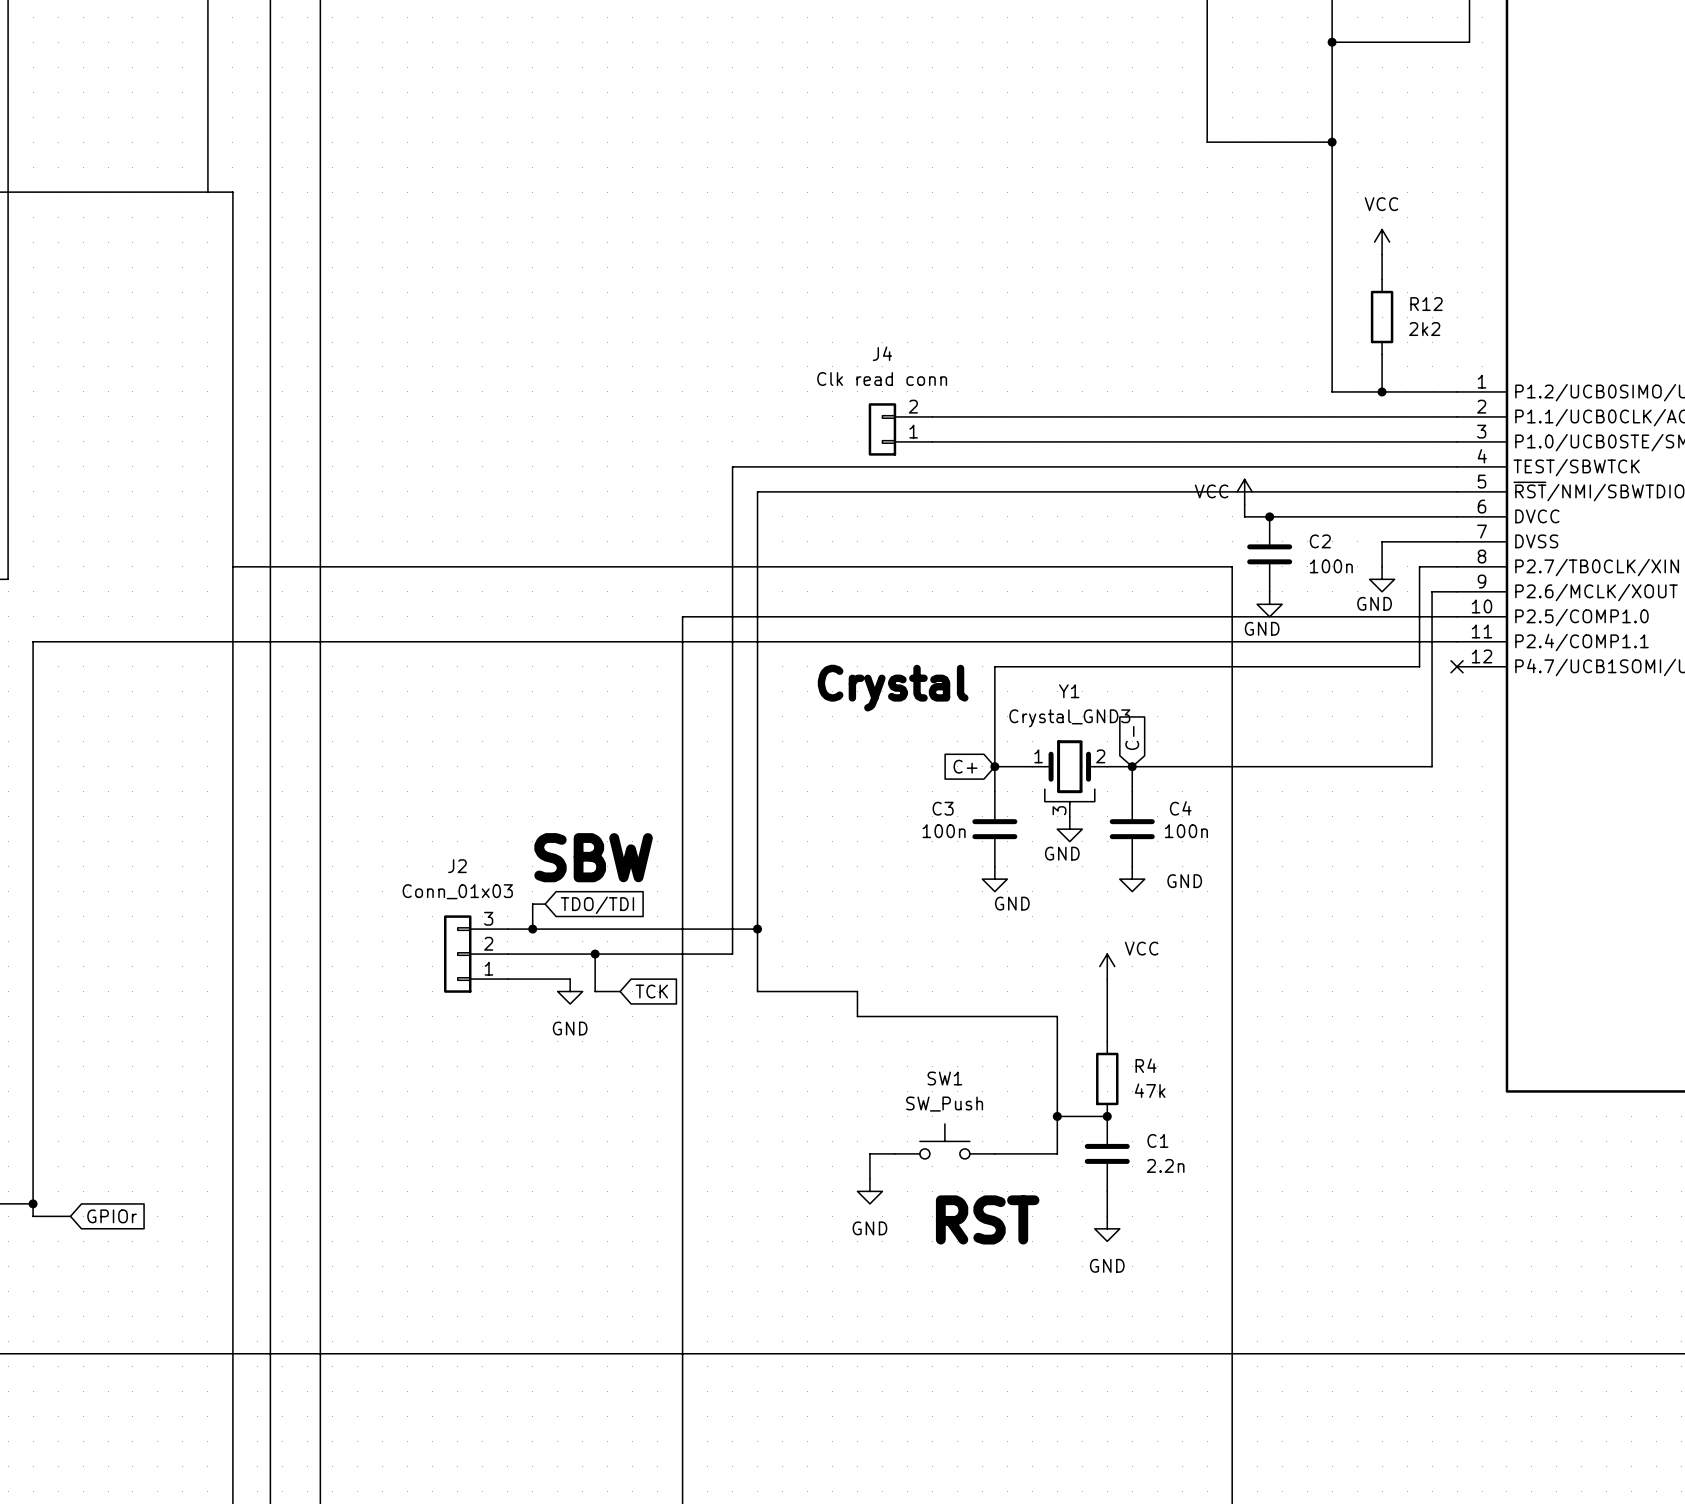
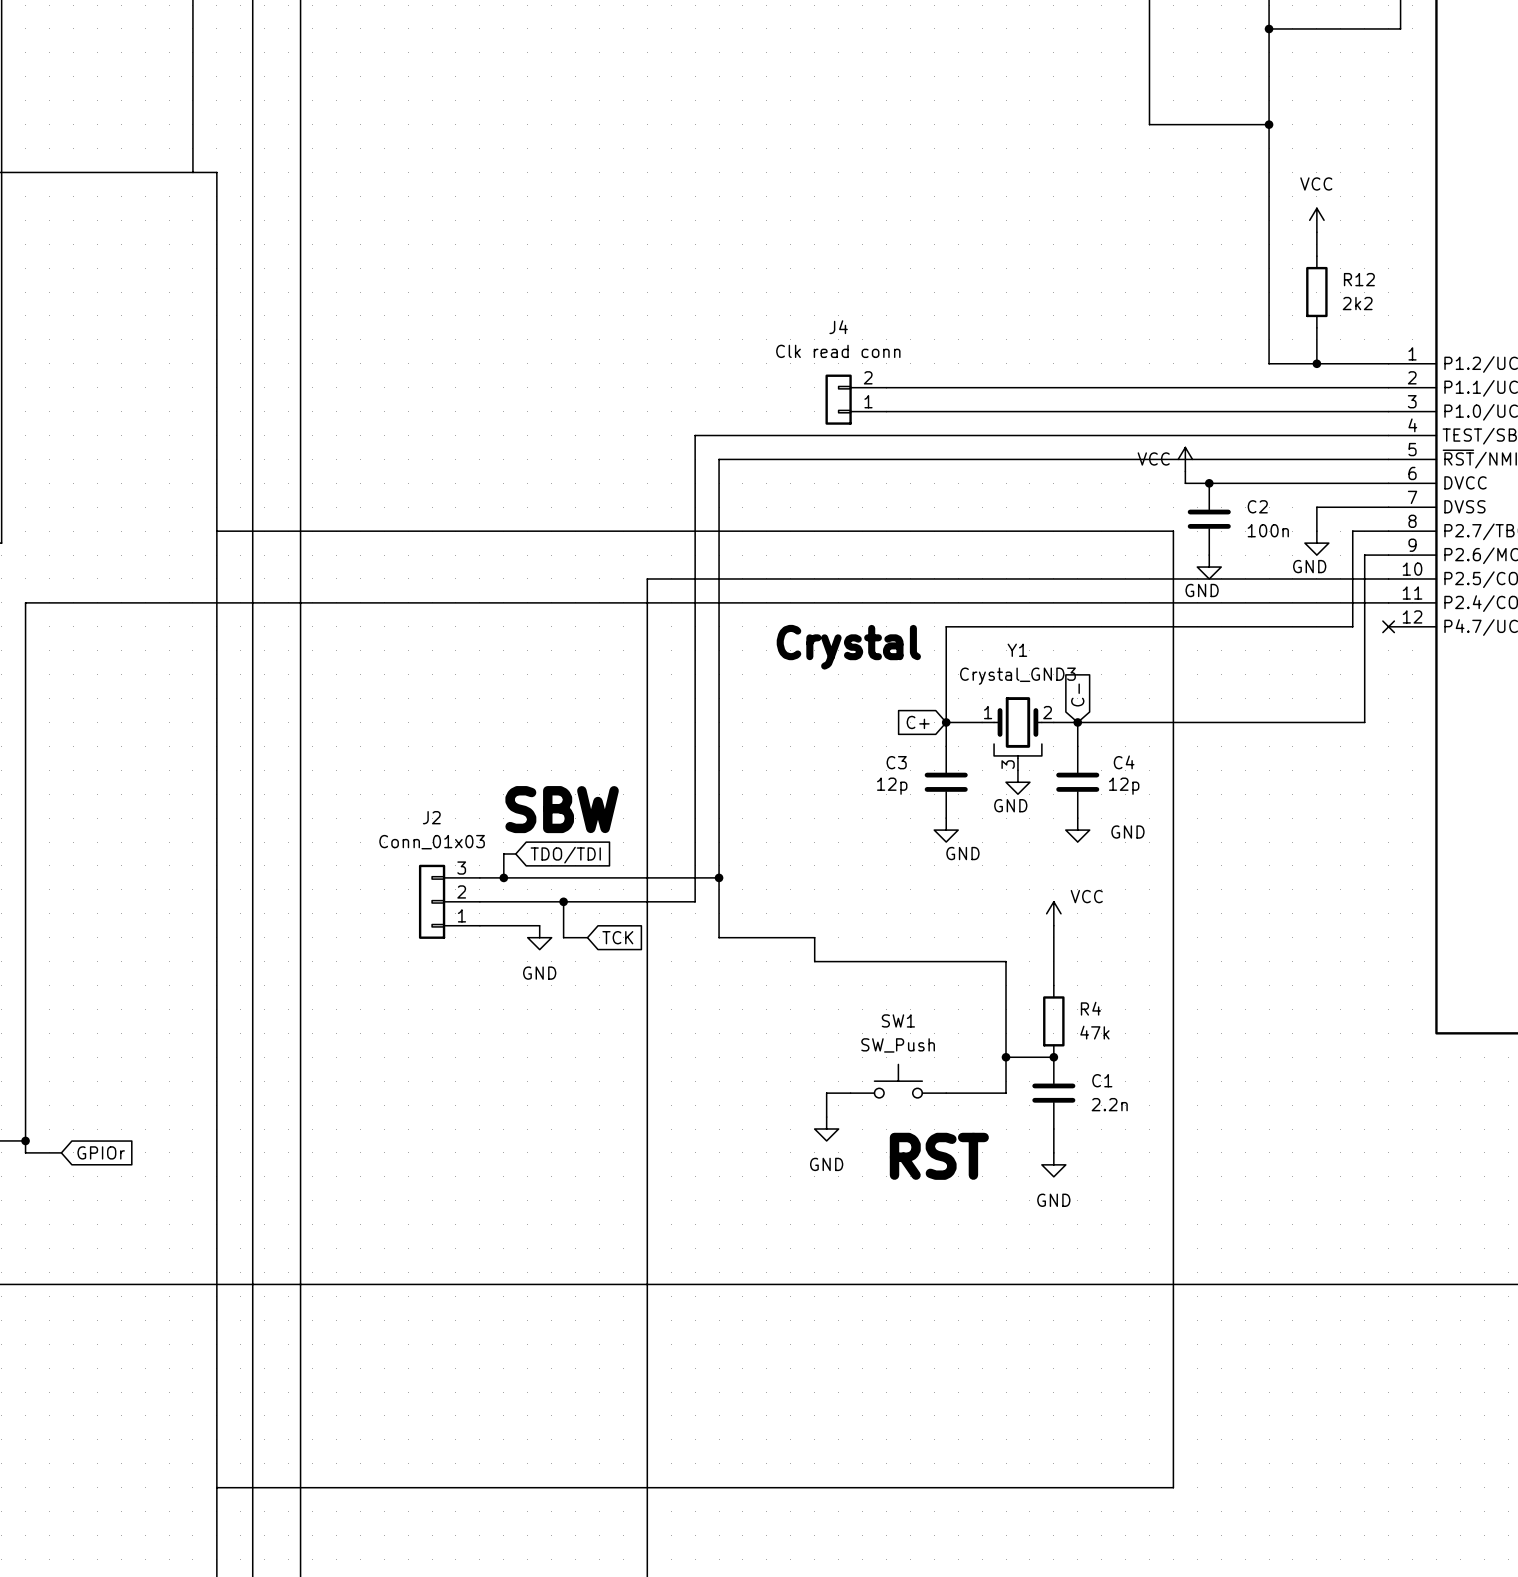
C3 value: 100n (944, 831) -> 12p (892, 786)
C4 value: 100n (1186, 831) -> 12p (1124, 786)

